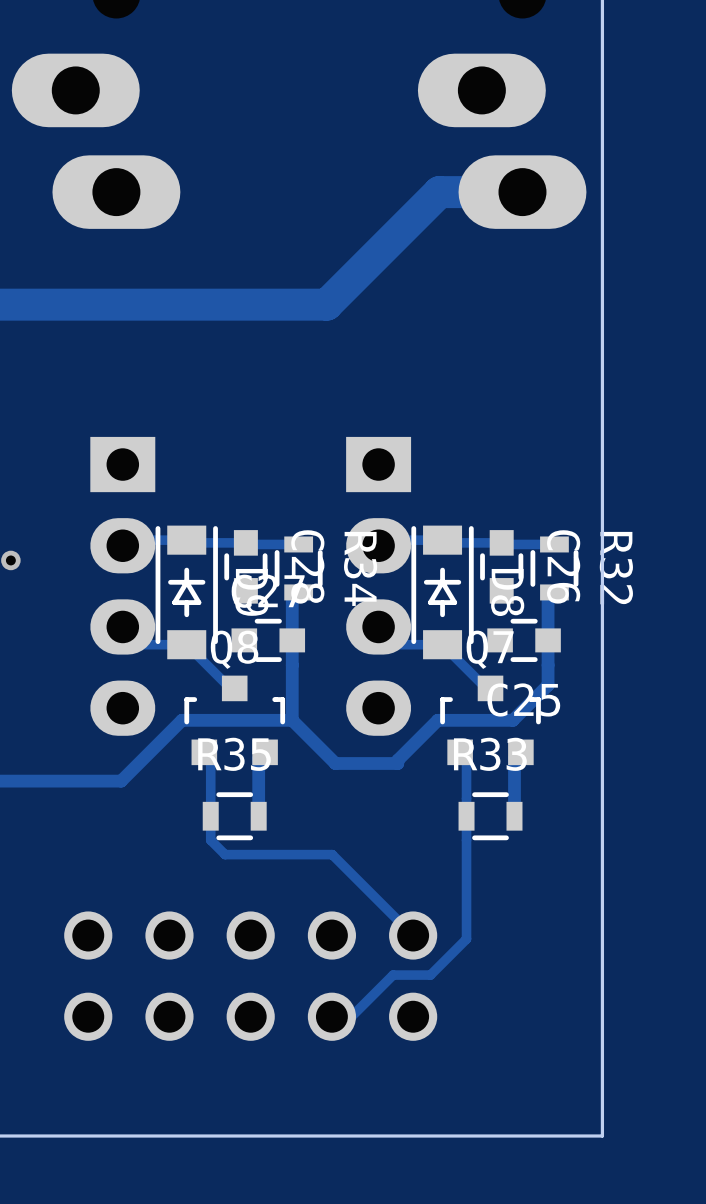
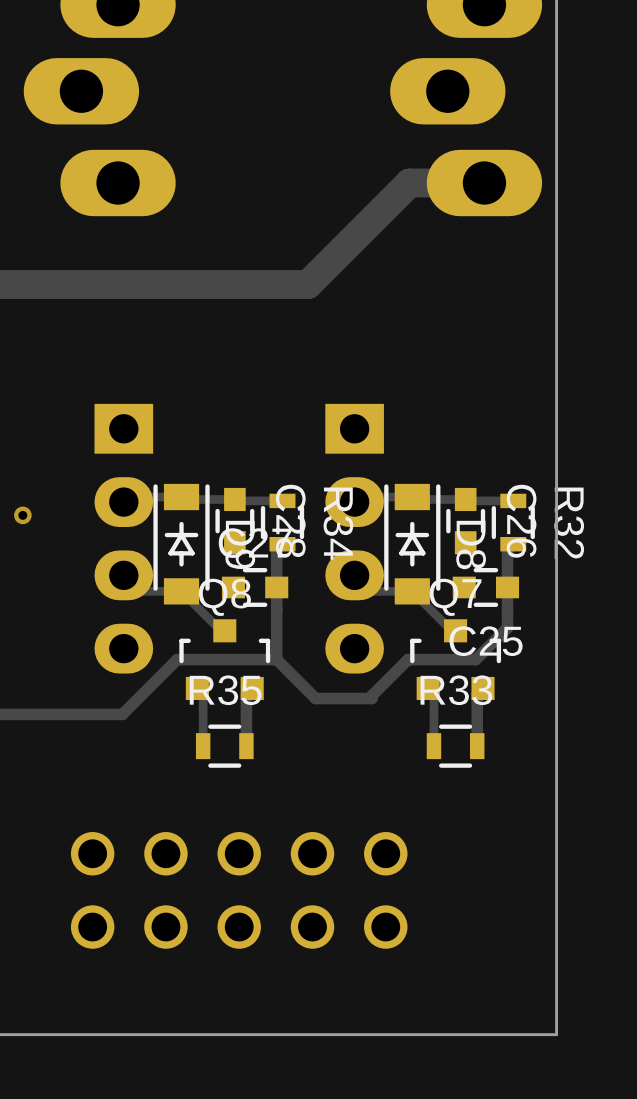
track: (210, 816) (210, 840) (225, 854) (332, 854) (413, 935) -> none
track: (466, 816) (466, 939) (430, 975) (393, 975) (351, 1016) (331, 1016) -> none

